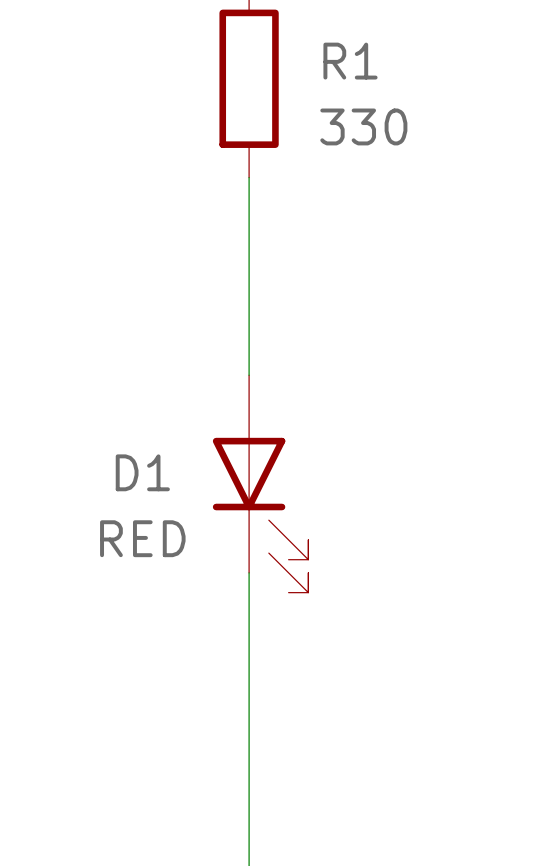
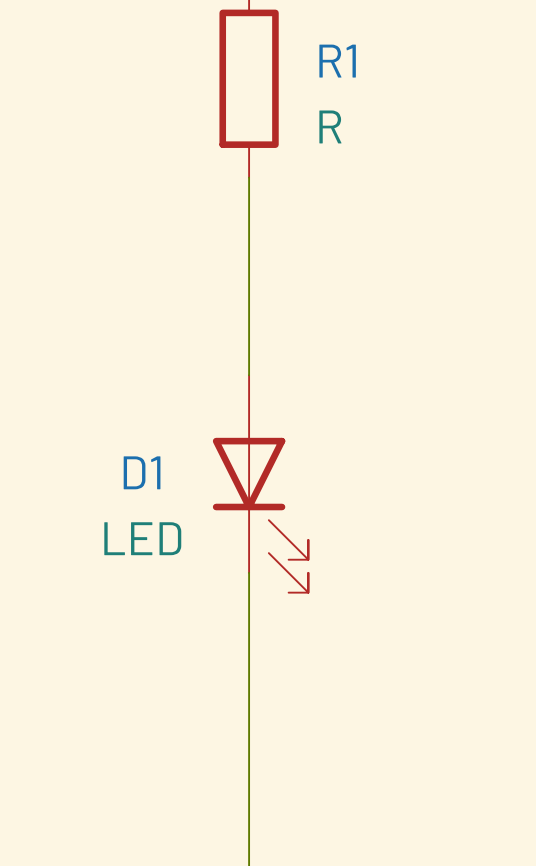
R1 value: 330 (363, 126) -> R (330, 126)
D1 value: RED (142, 538) -> LED (142, 538)

